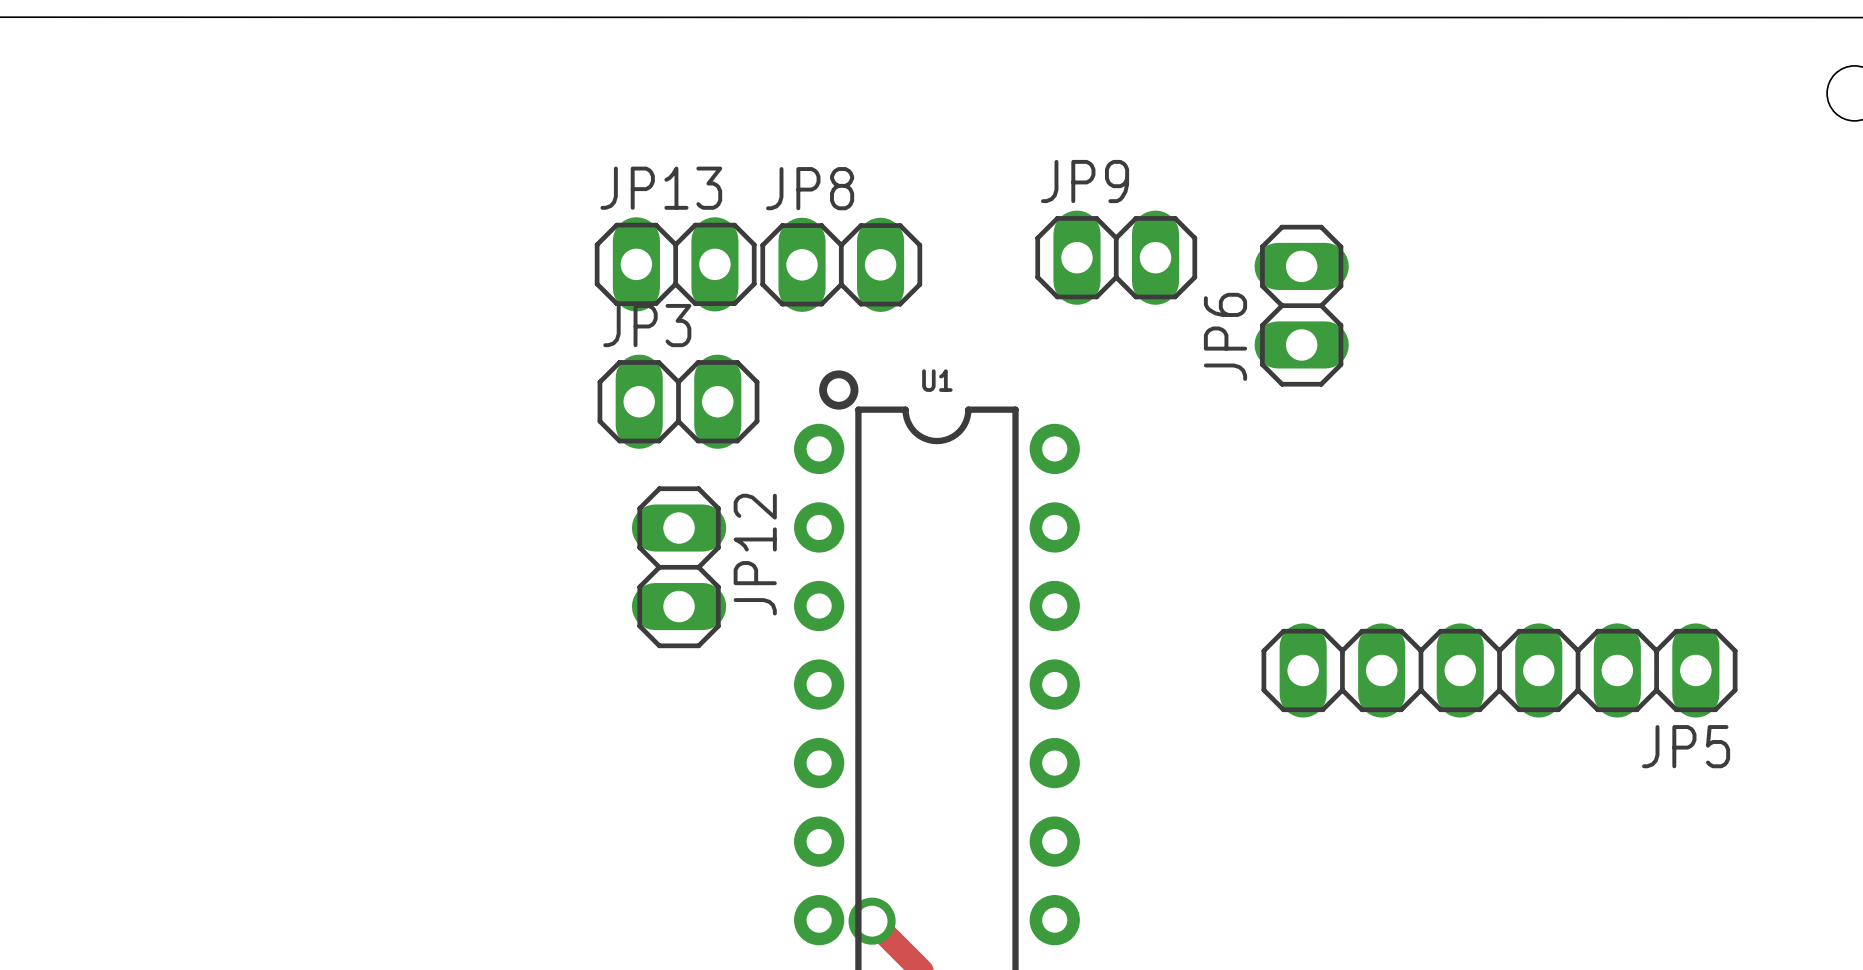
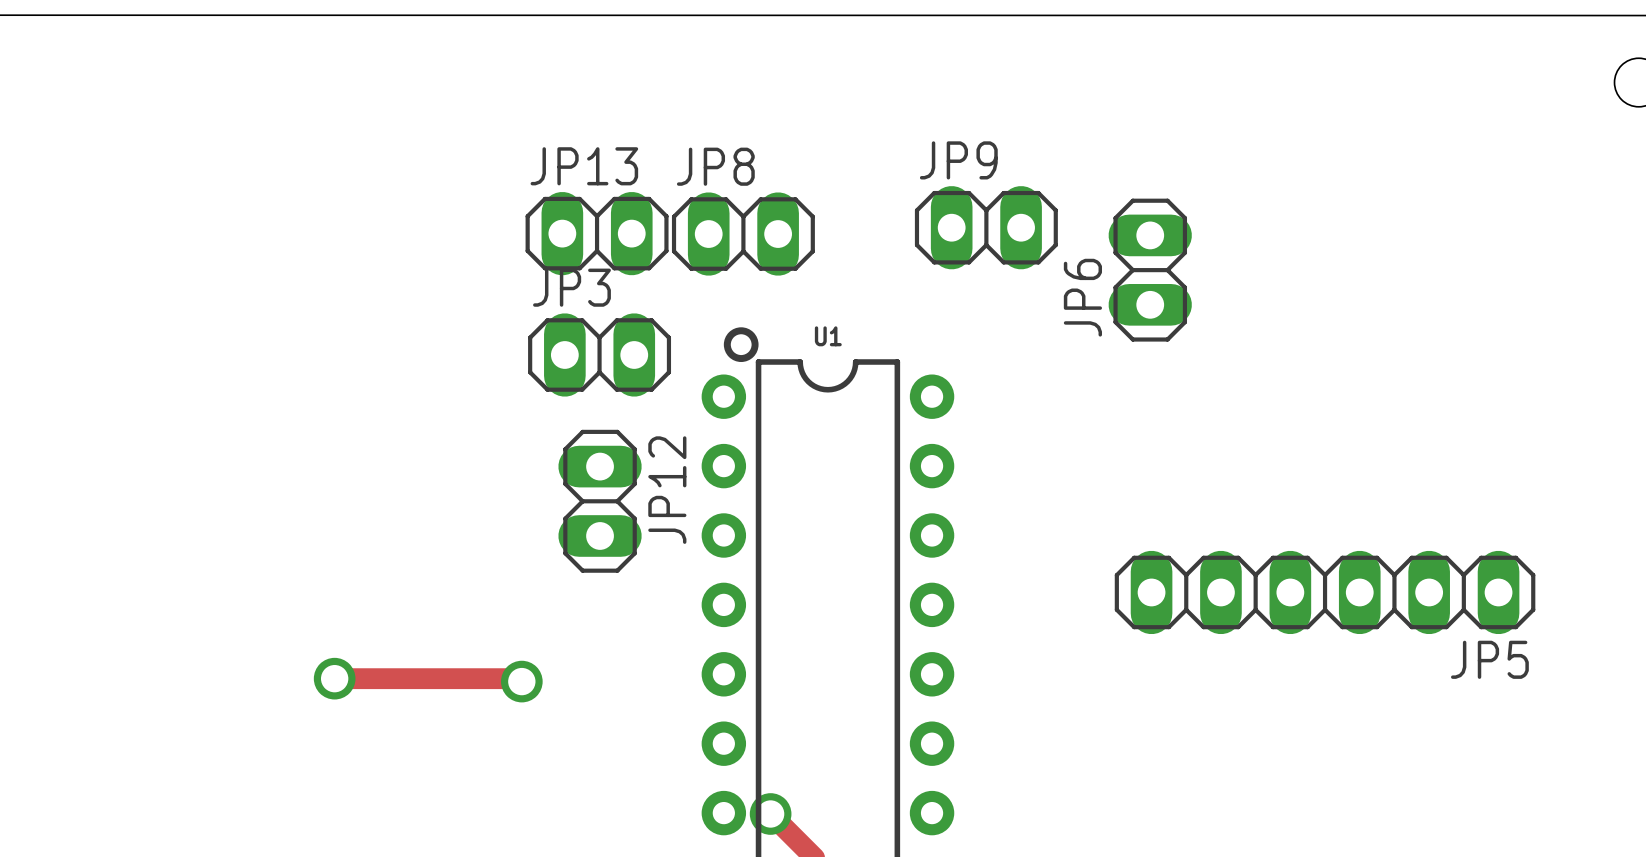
track: none -> (334, 678) (518, 678) (521, 681)
via: none -> (334, 678)
via: none -> (521, 681)

